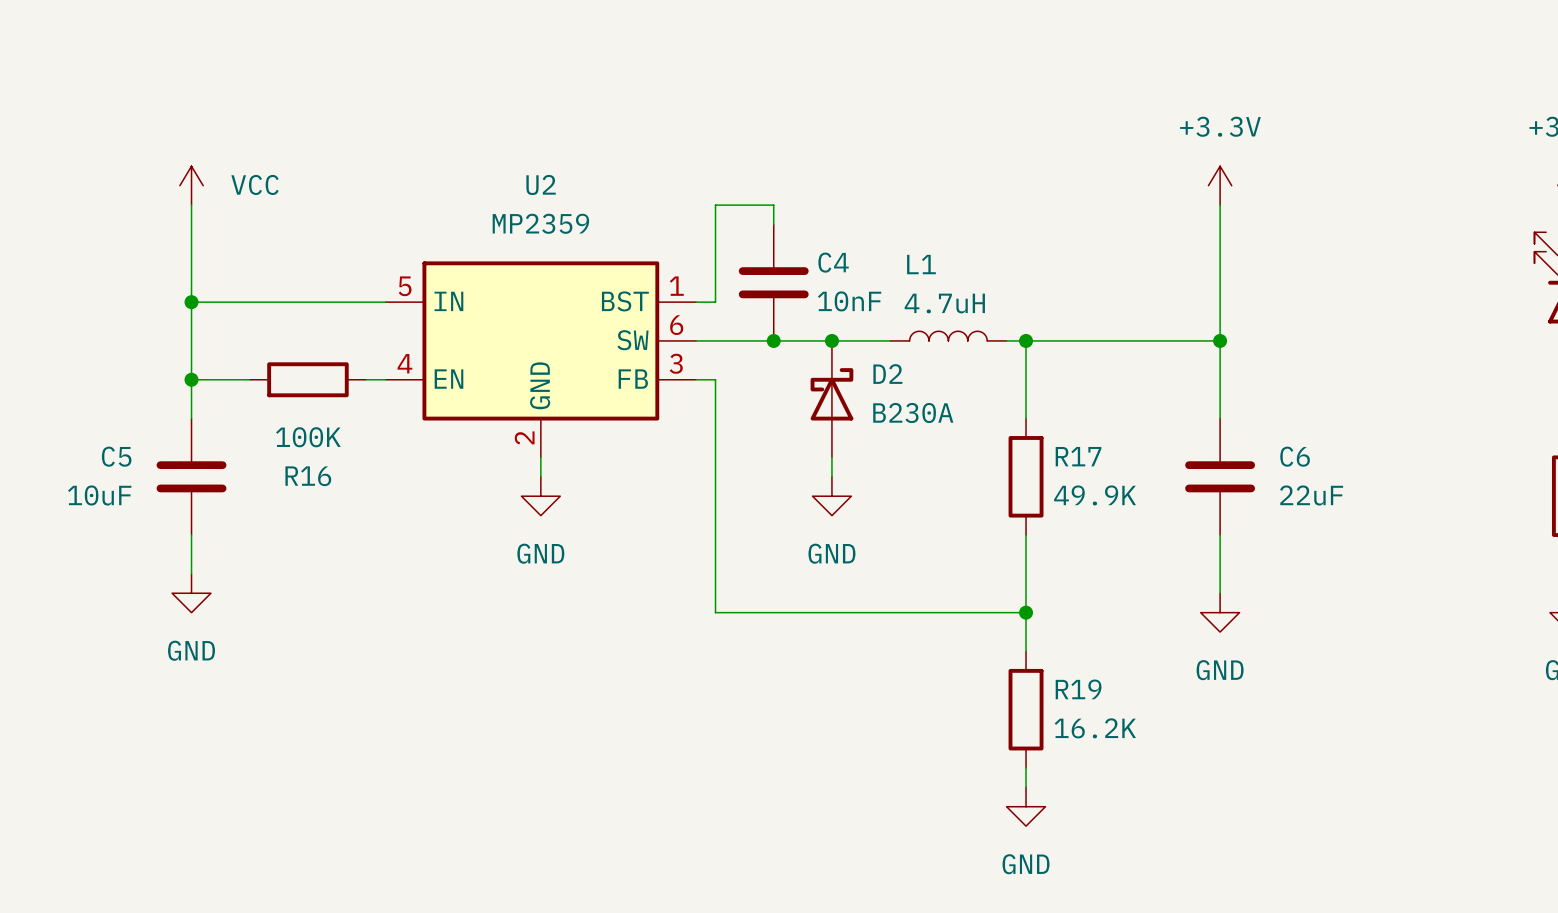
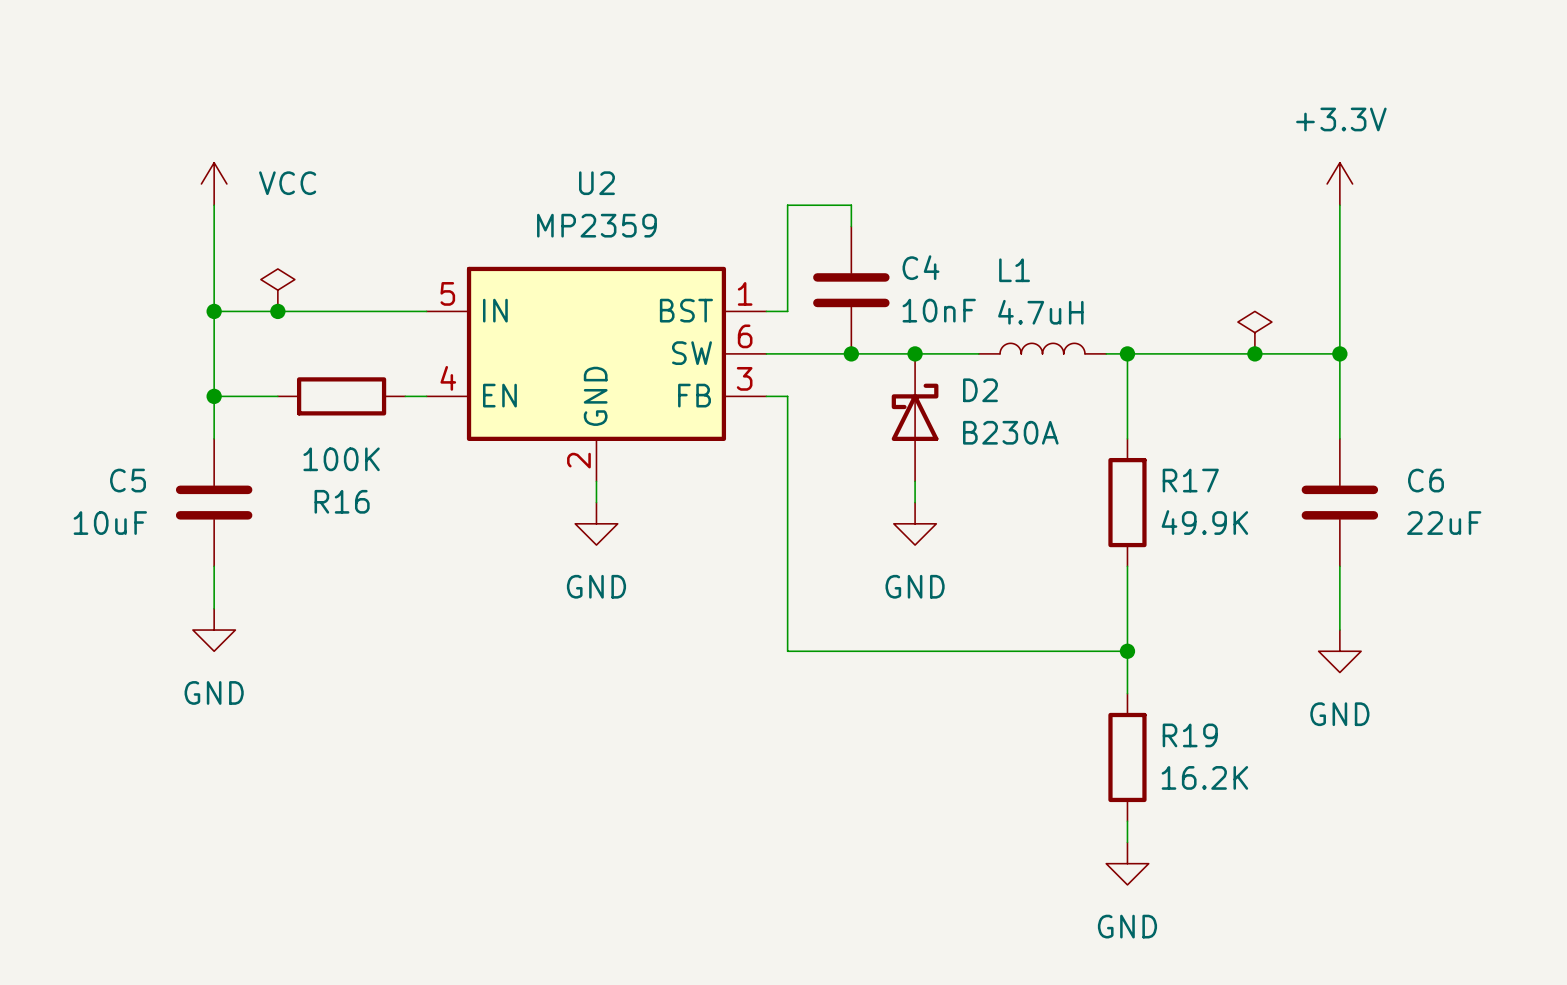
power symbol: none -> (277, 290)
junction: none -> (277, 311)
power symbol: none -> (1254, 332)
junction: none -> (1254, 353)

